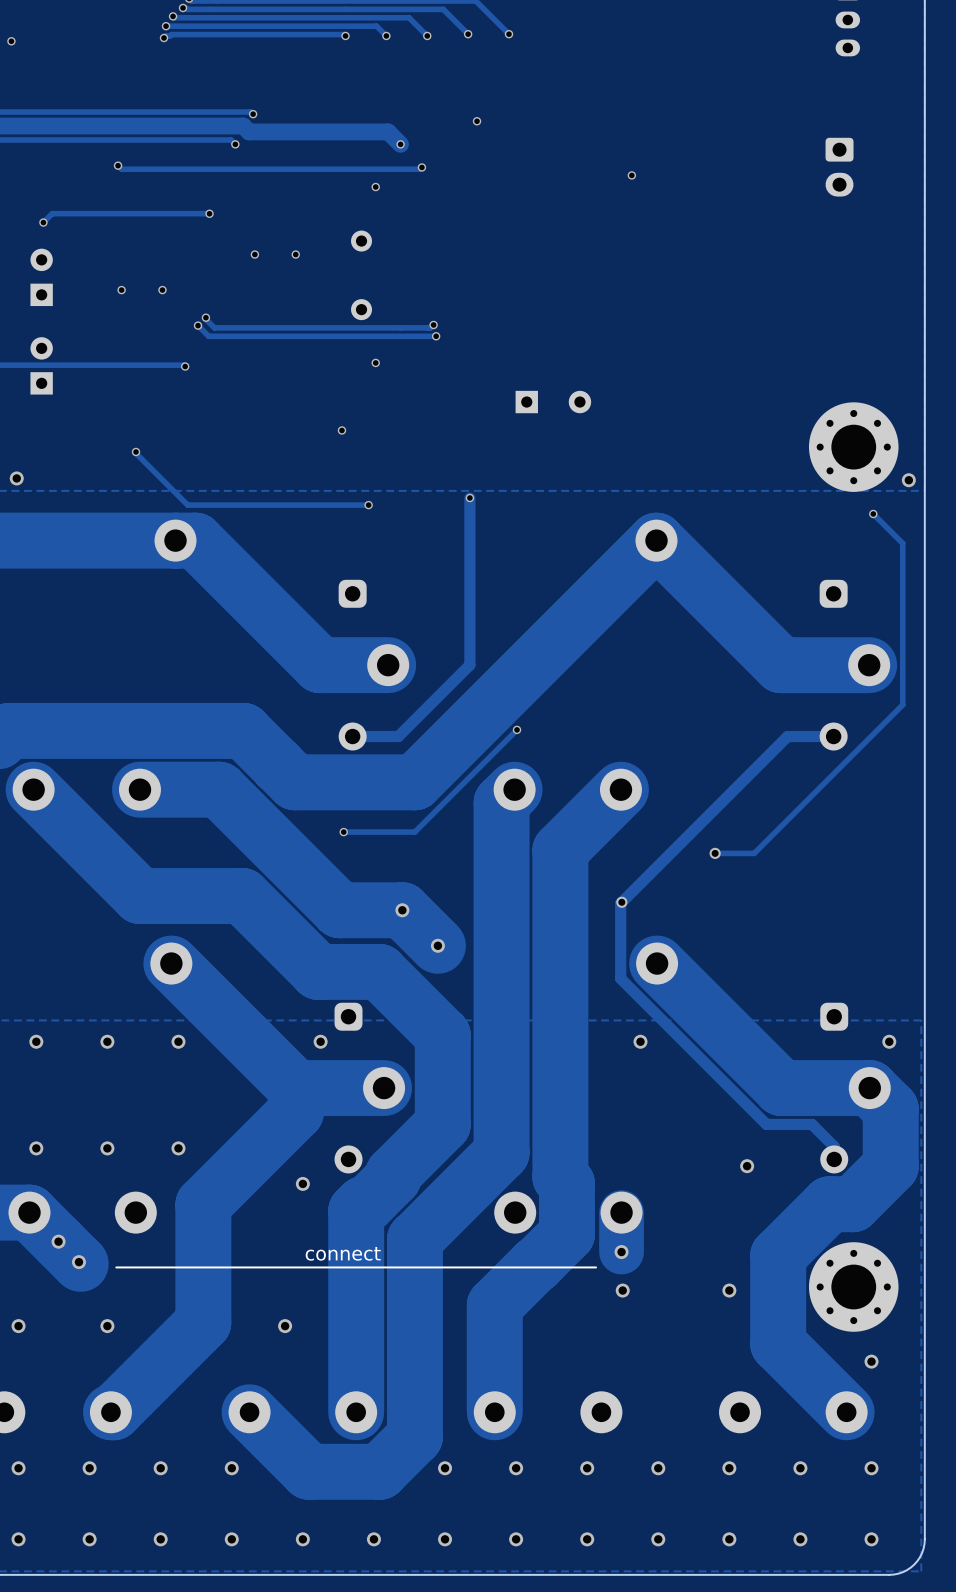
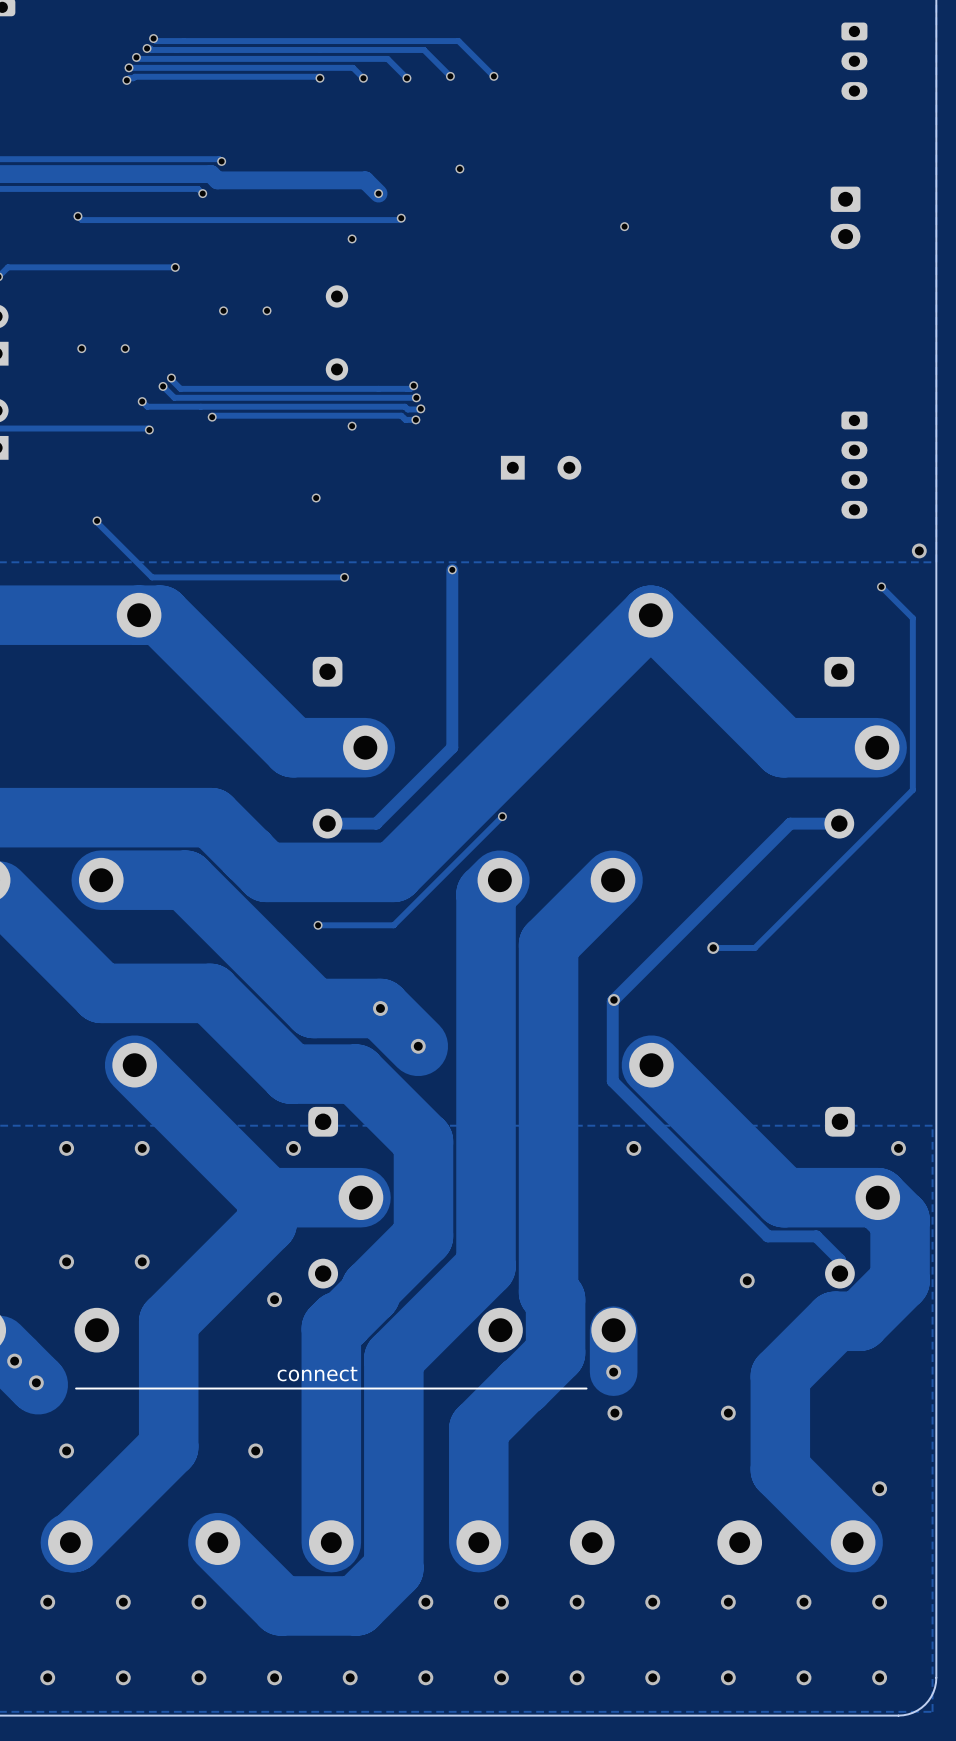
track: none -> (142, 401) (147, 406) (405, 406) (407, 409) (420, 408)
via: none -> (142, 401)
via: none -> (420, 408)
track: none -> (212, 417) (401, 415) (405, 419) (415, 419)
via: none -> (212, 417)
via: none -> (415, 419)
part: none -> (854, 465)
part: (853, 447) -> none
part: (853, 1286) -> none

